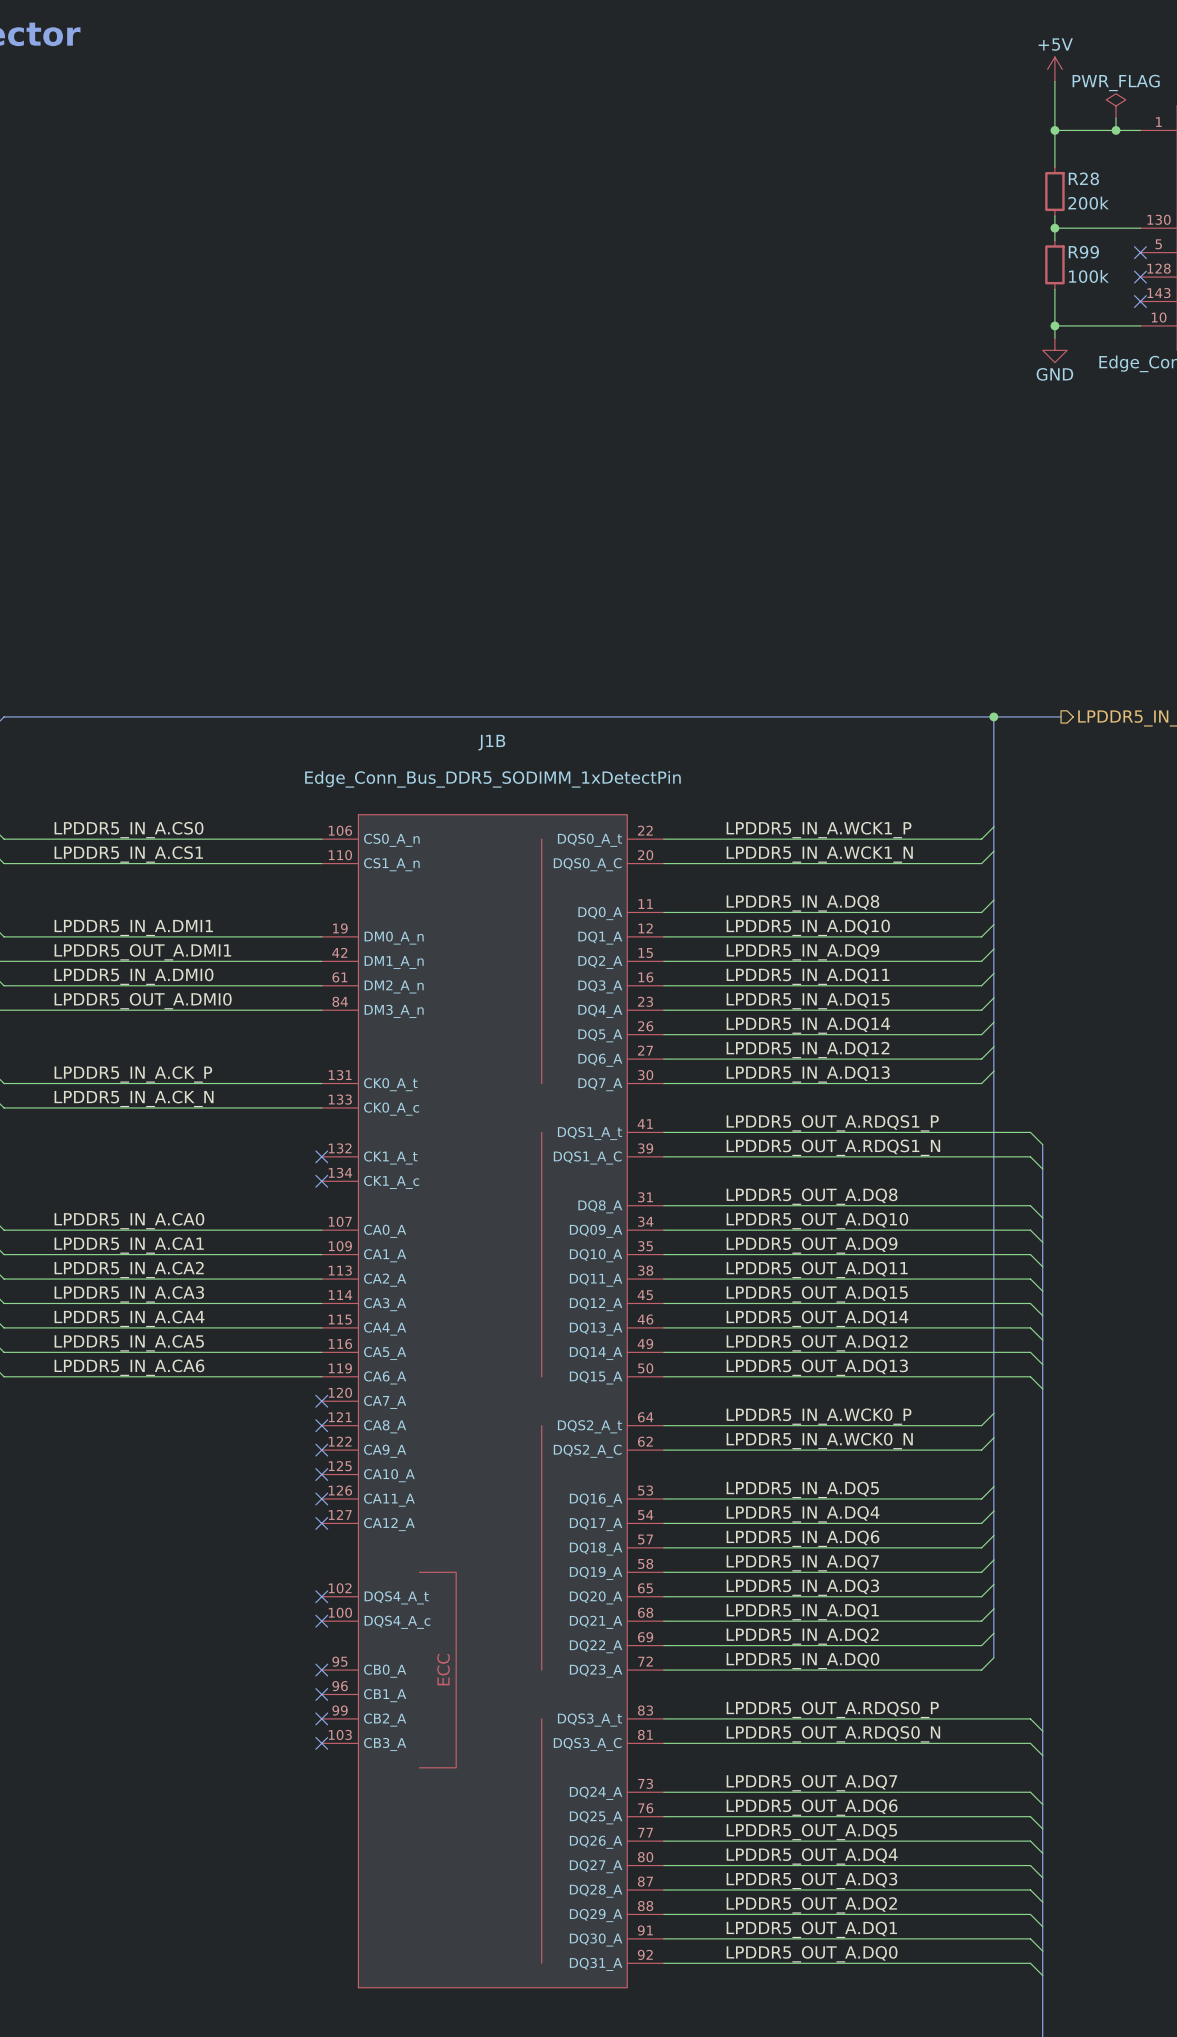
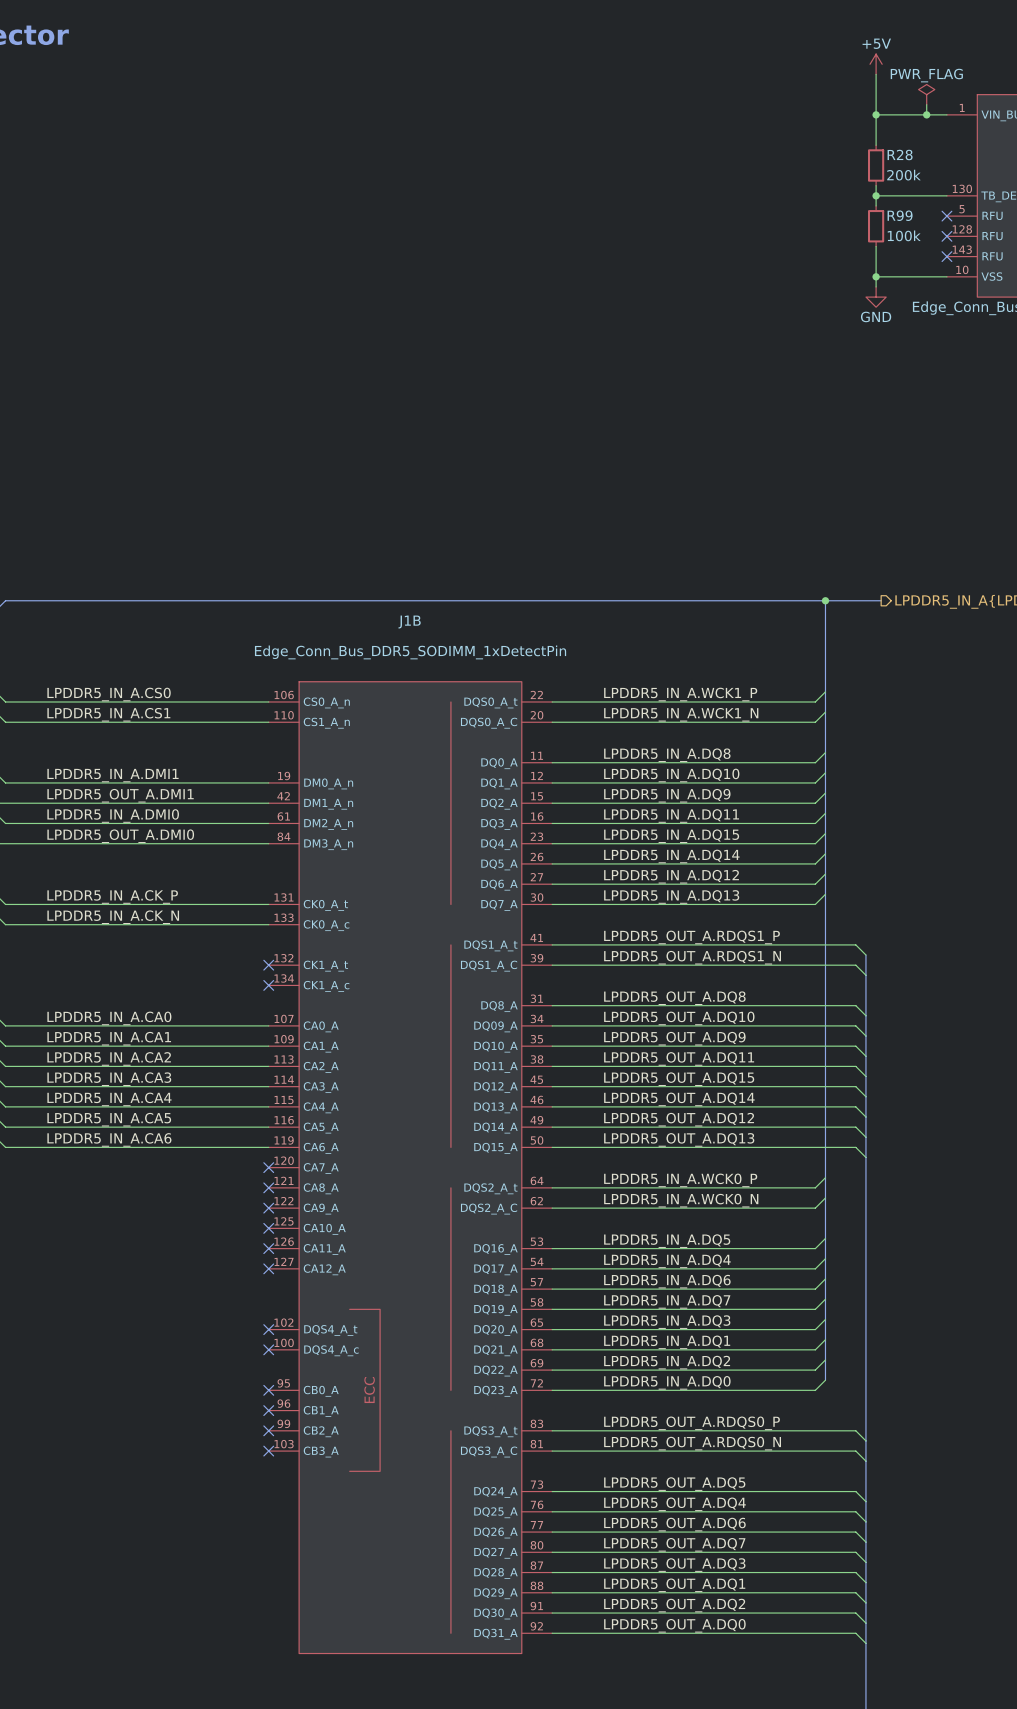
label: LPDDR5_OUT_A.DQ7 (811, 1783) -> LPDDR5_OUT_A.DQ5 (674, 1484)
label: LPDDR5_OUT_A.DQ6 (812, 1807) -> LPDDR5_OUT_A.DQ4 (674, 1504)
label: LPDDR5_OUT_A.DQ5 (811, 1832) -> LPDDR5_OUT_A.DQ6 (674, 1524)
label: LPDDR5_OUT_A.DQ4 (812, 1856) -> LPDDR5_OUT_A.DQ7 (674, 1544)
label: LPDDR5_OUT_A.DQ2 (811, 1905) -> LPDDR5_OUT_A.DQ1 (674, 1585)
label: LPDDR5_OUT_A.DQ1 (811, 1929) -> LPDDR5_OUT_A.DQ2 (674, 1605)

